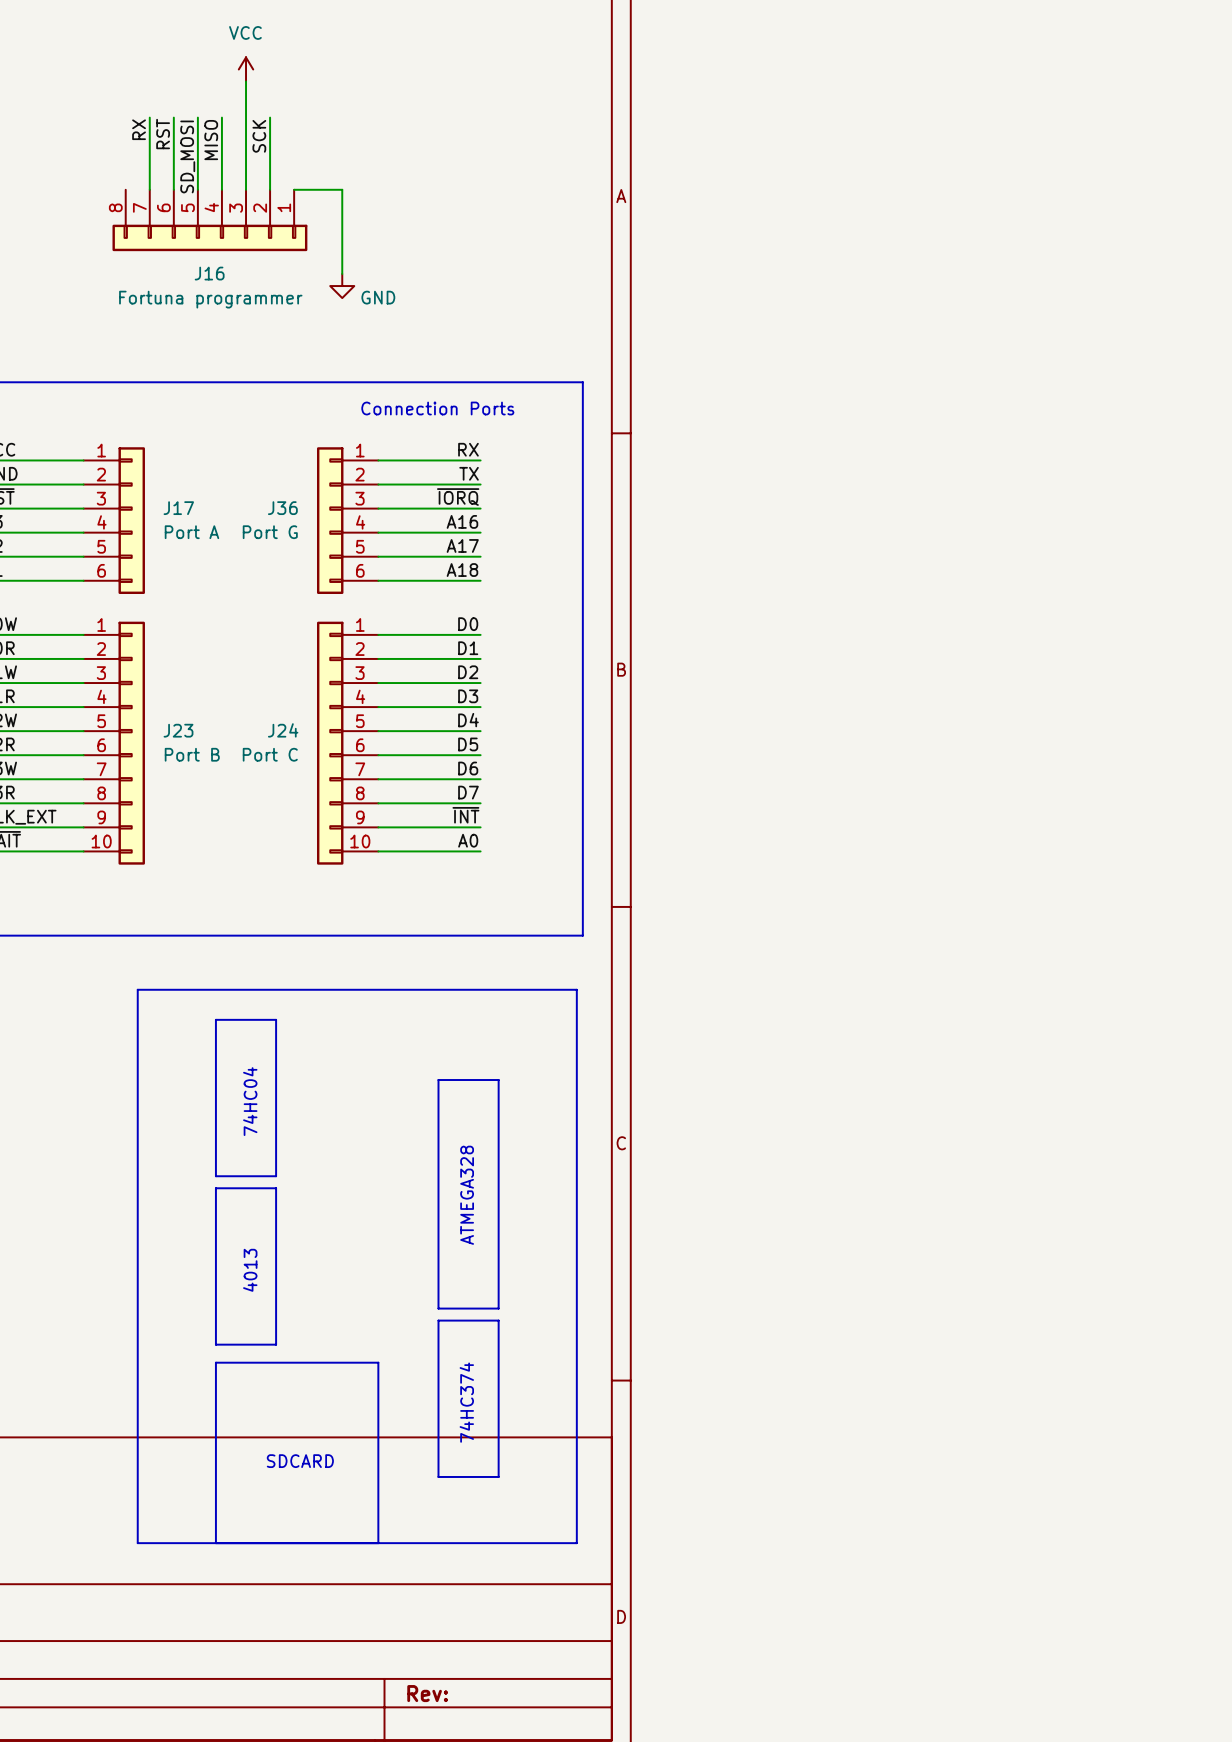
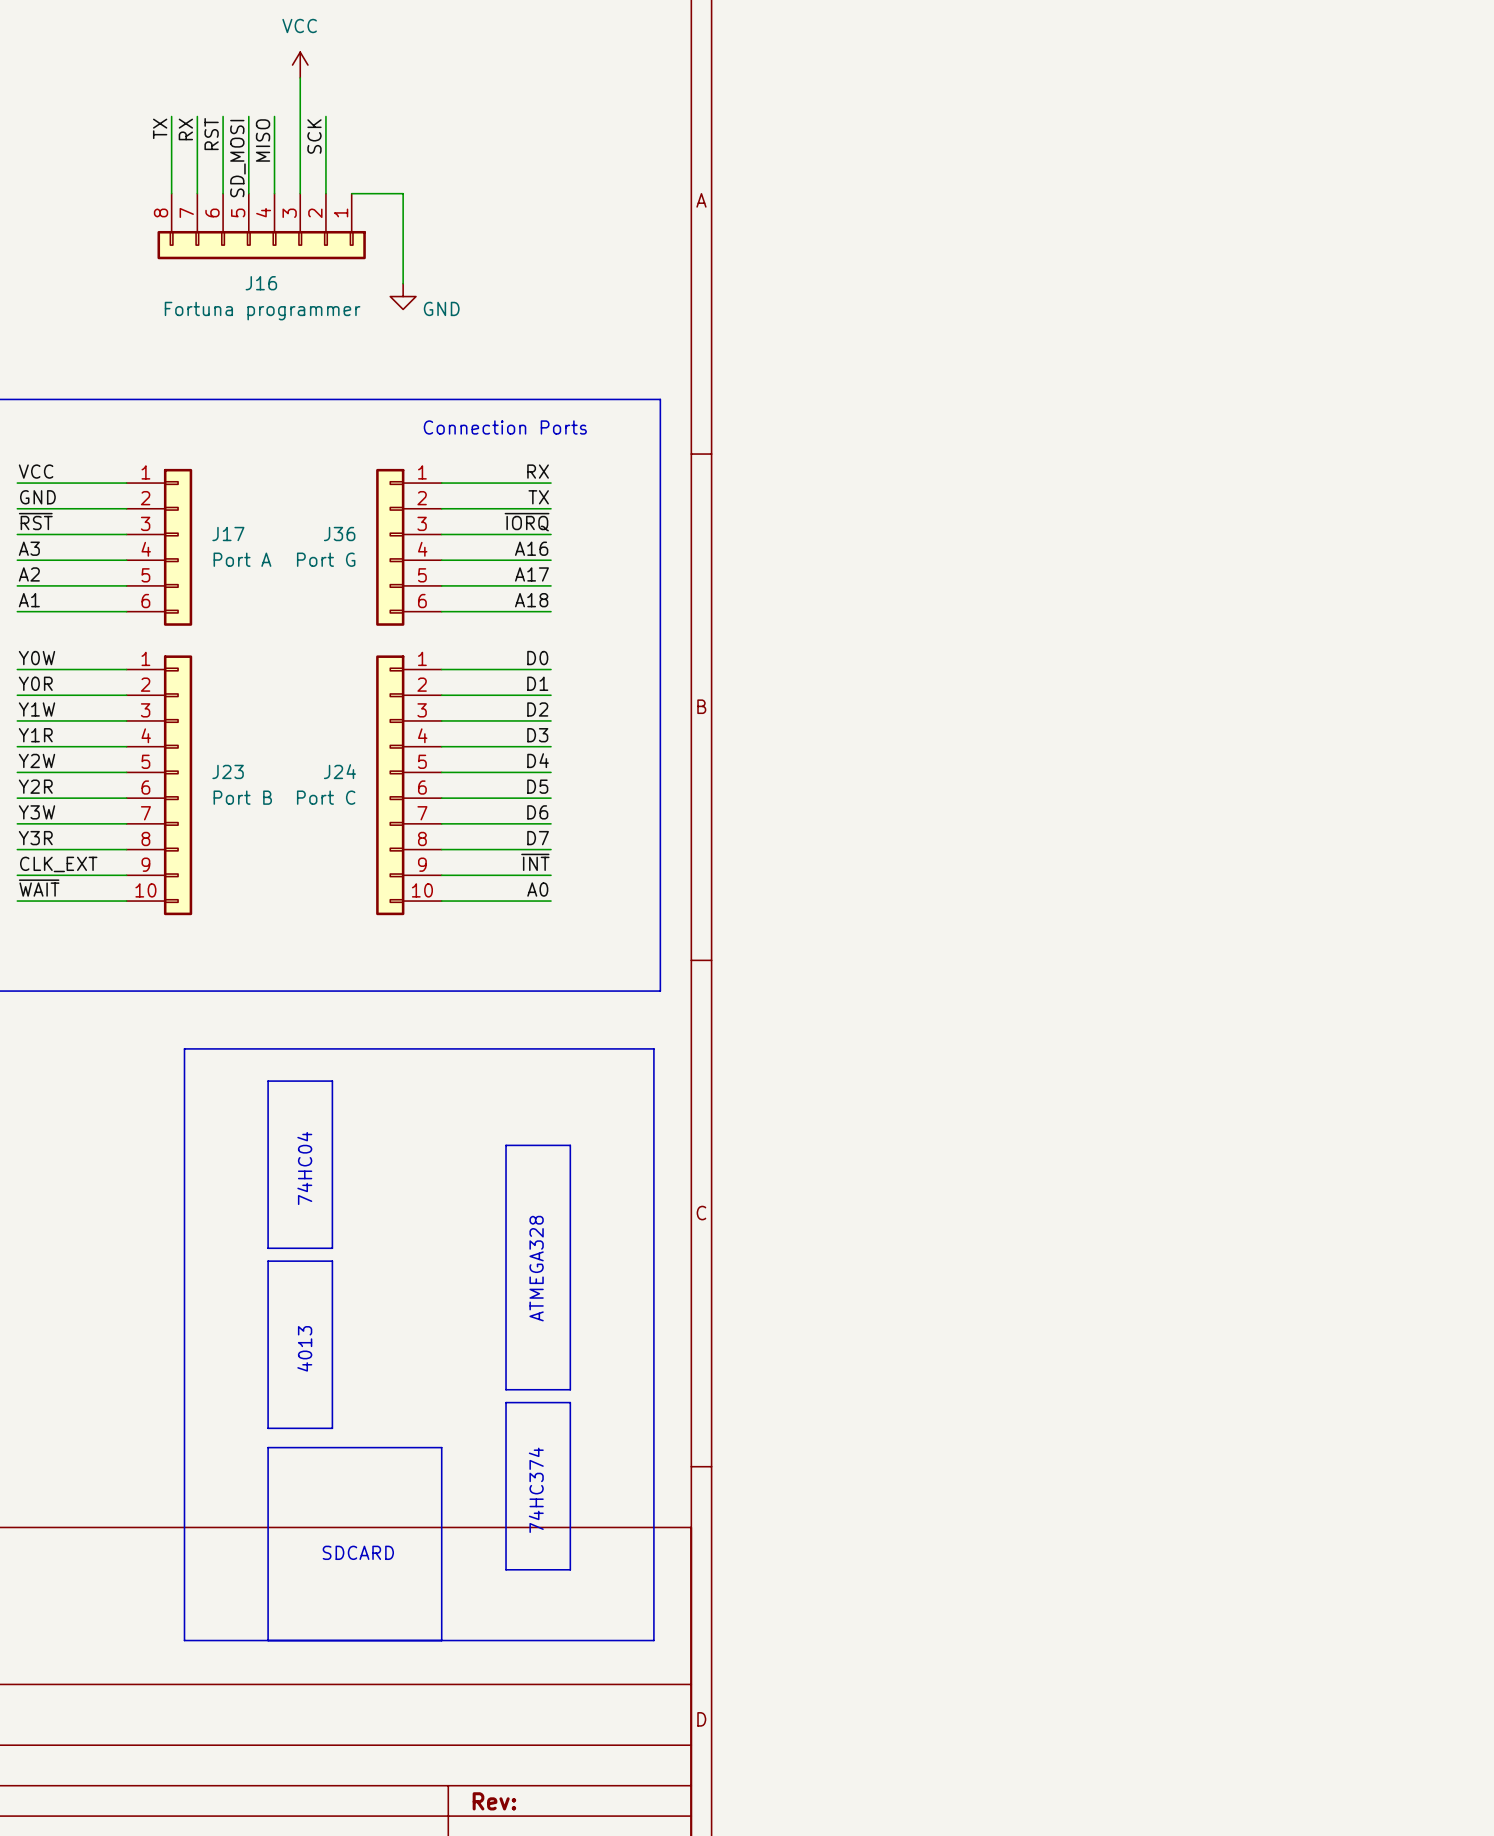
wire: none -> (171, 116) (171, 193)
label: none -> TX (160, 128)

